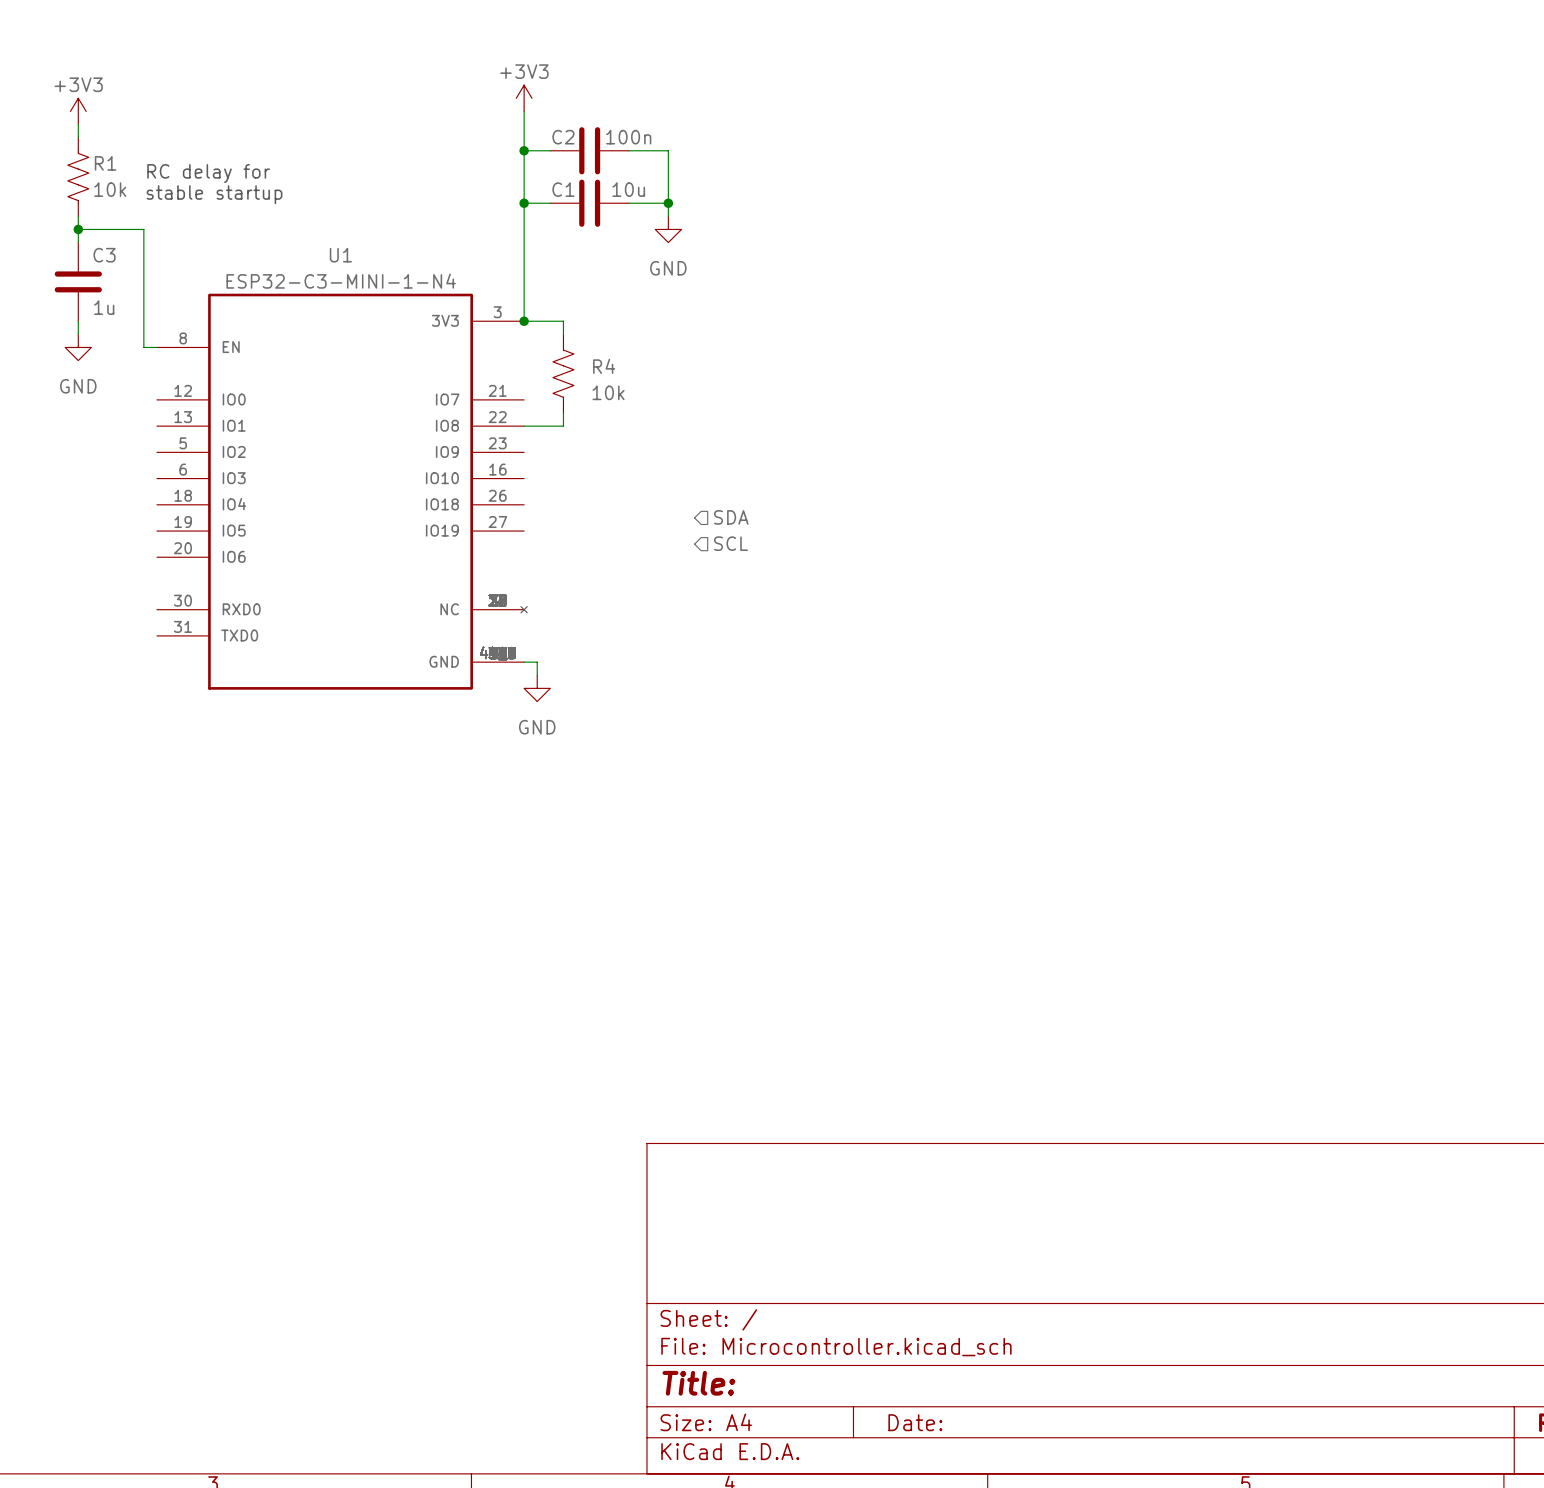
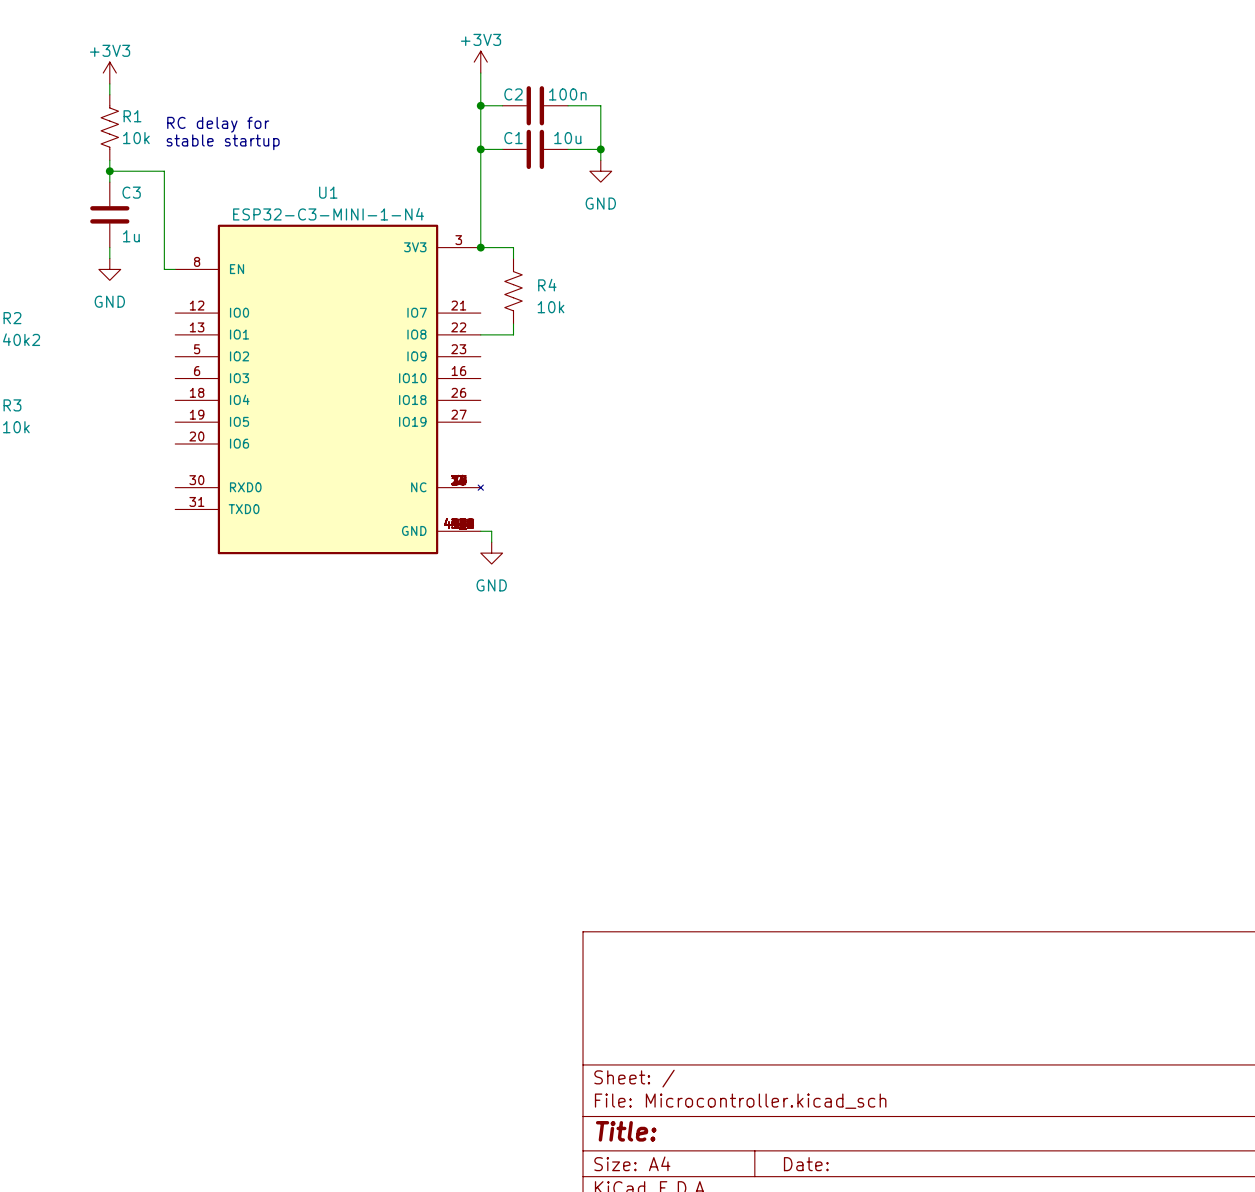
hierarchical label: SDA (731, 517) -> none
hierarchical label: SCL (731, 543) -> none

